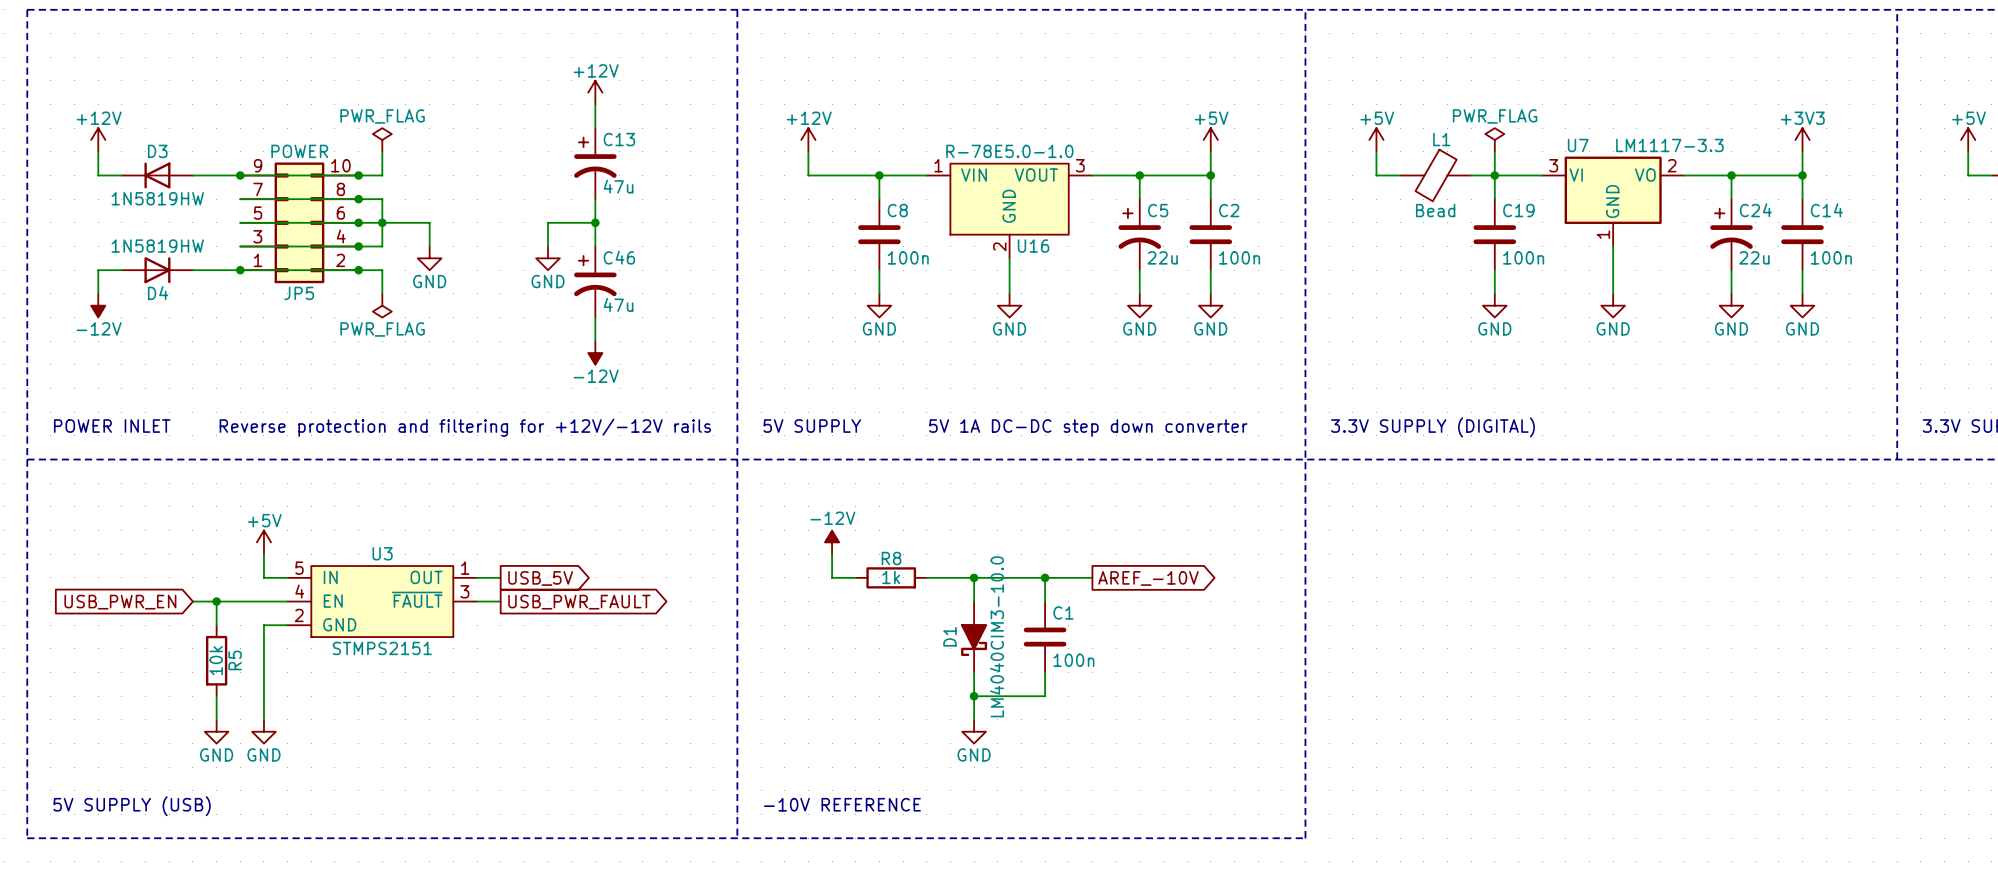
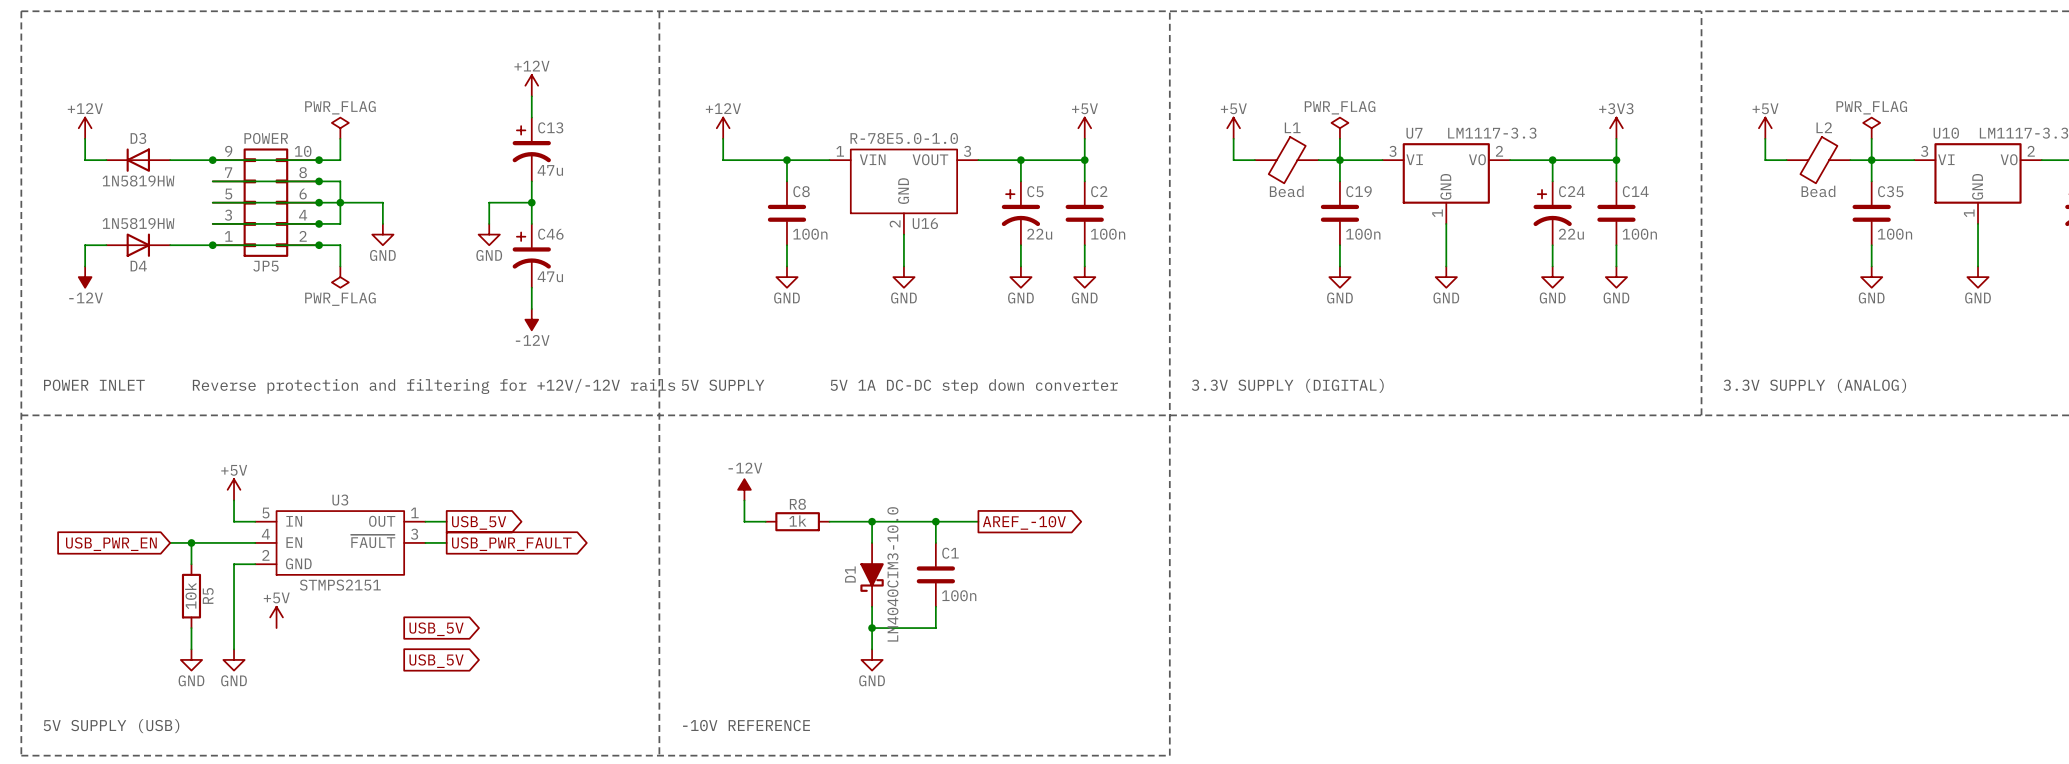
power symbol: none -> +5V (276, 617)
global label: none -> USB_5V (436, 629)
global label: none -> USB_5V (436, 661)

